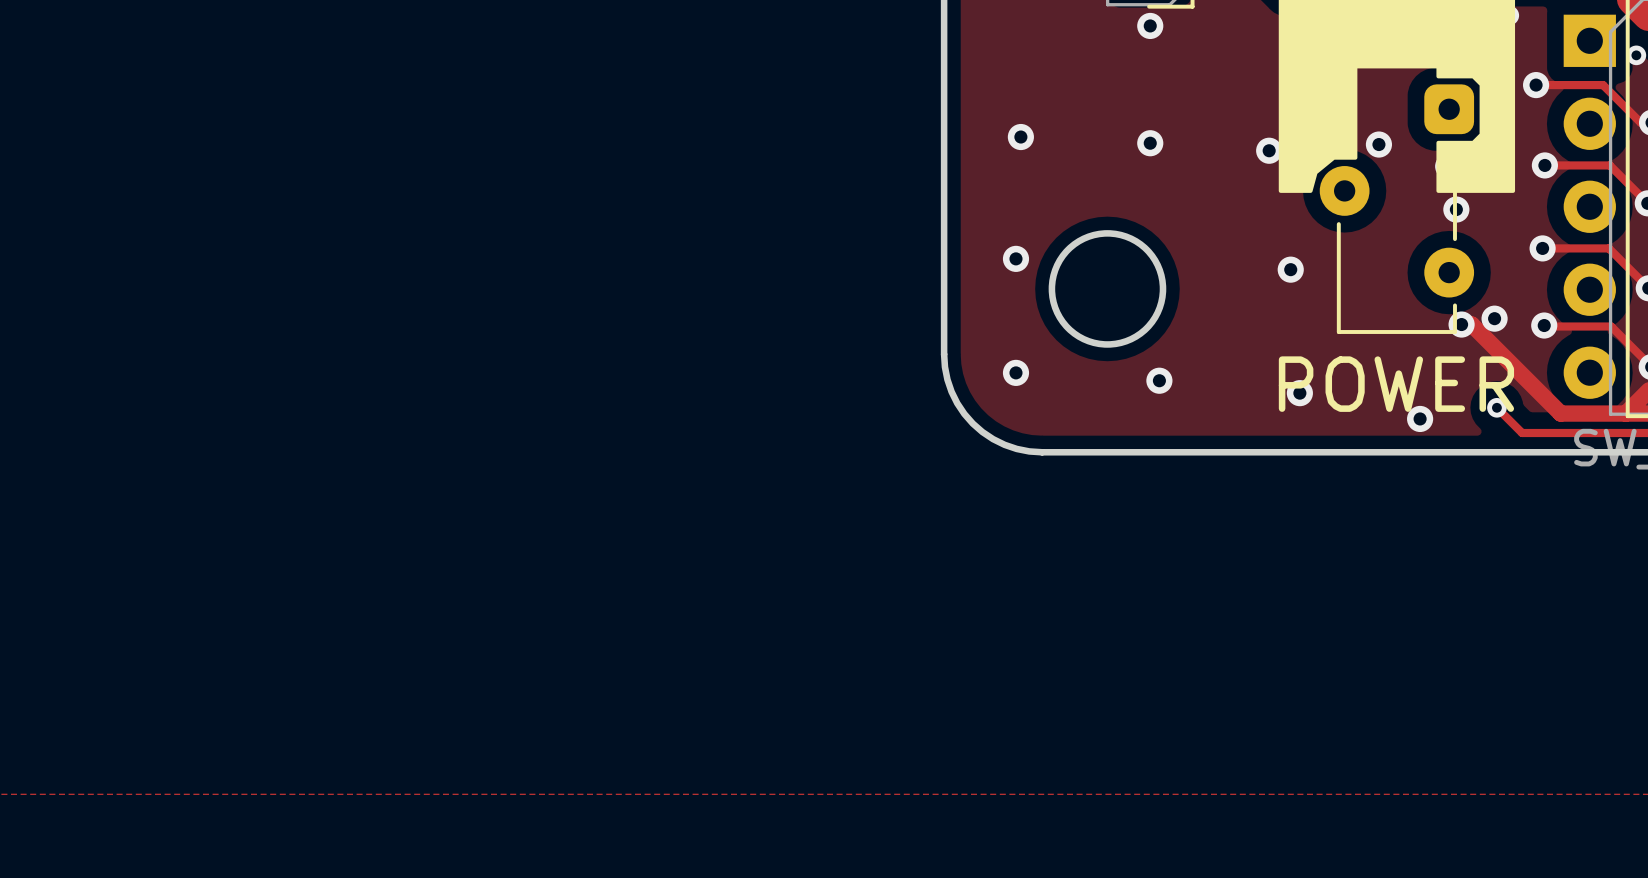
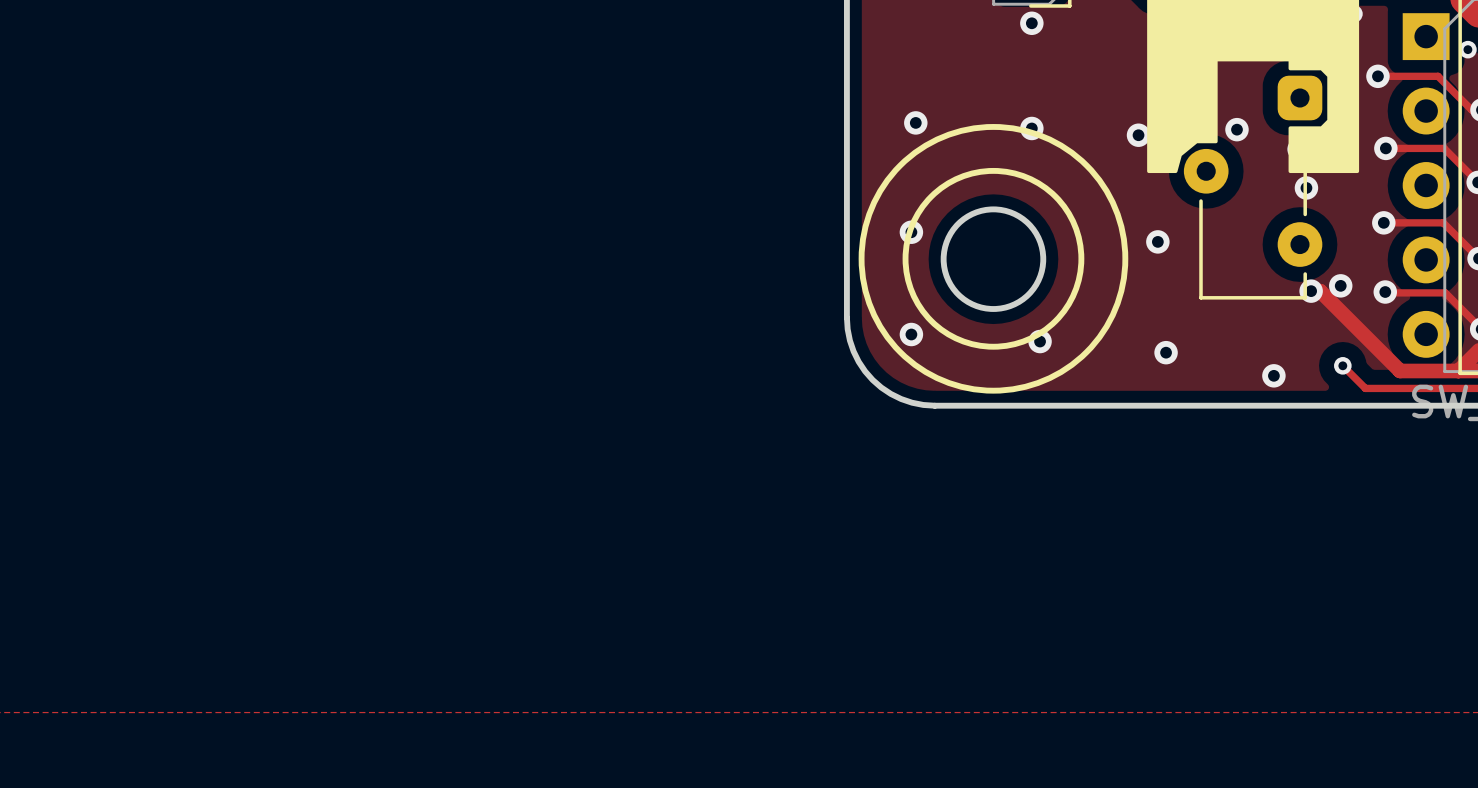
drawing: none -> [858, 124, 1129, 394]
text: POWER (1396, 384) -> none

